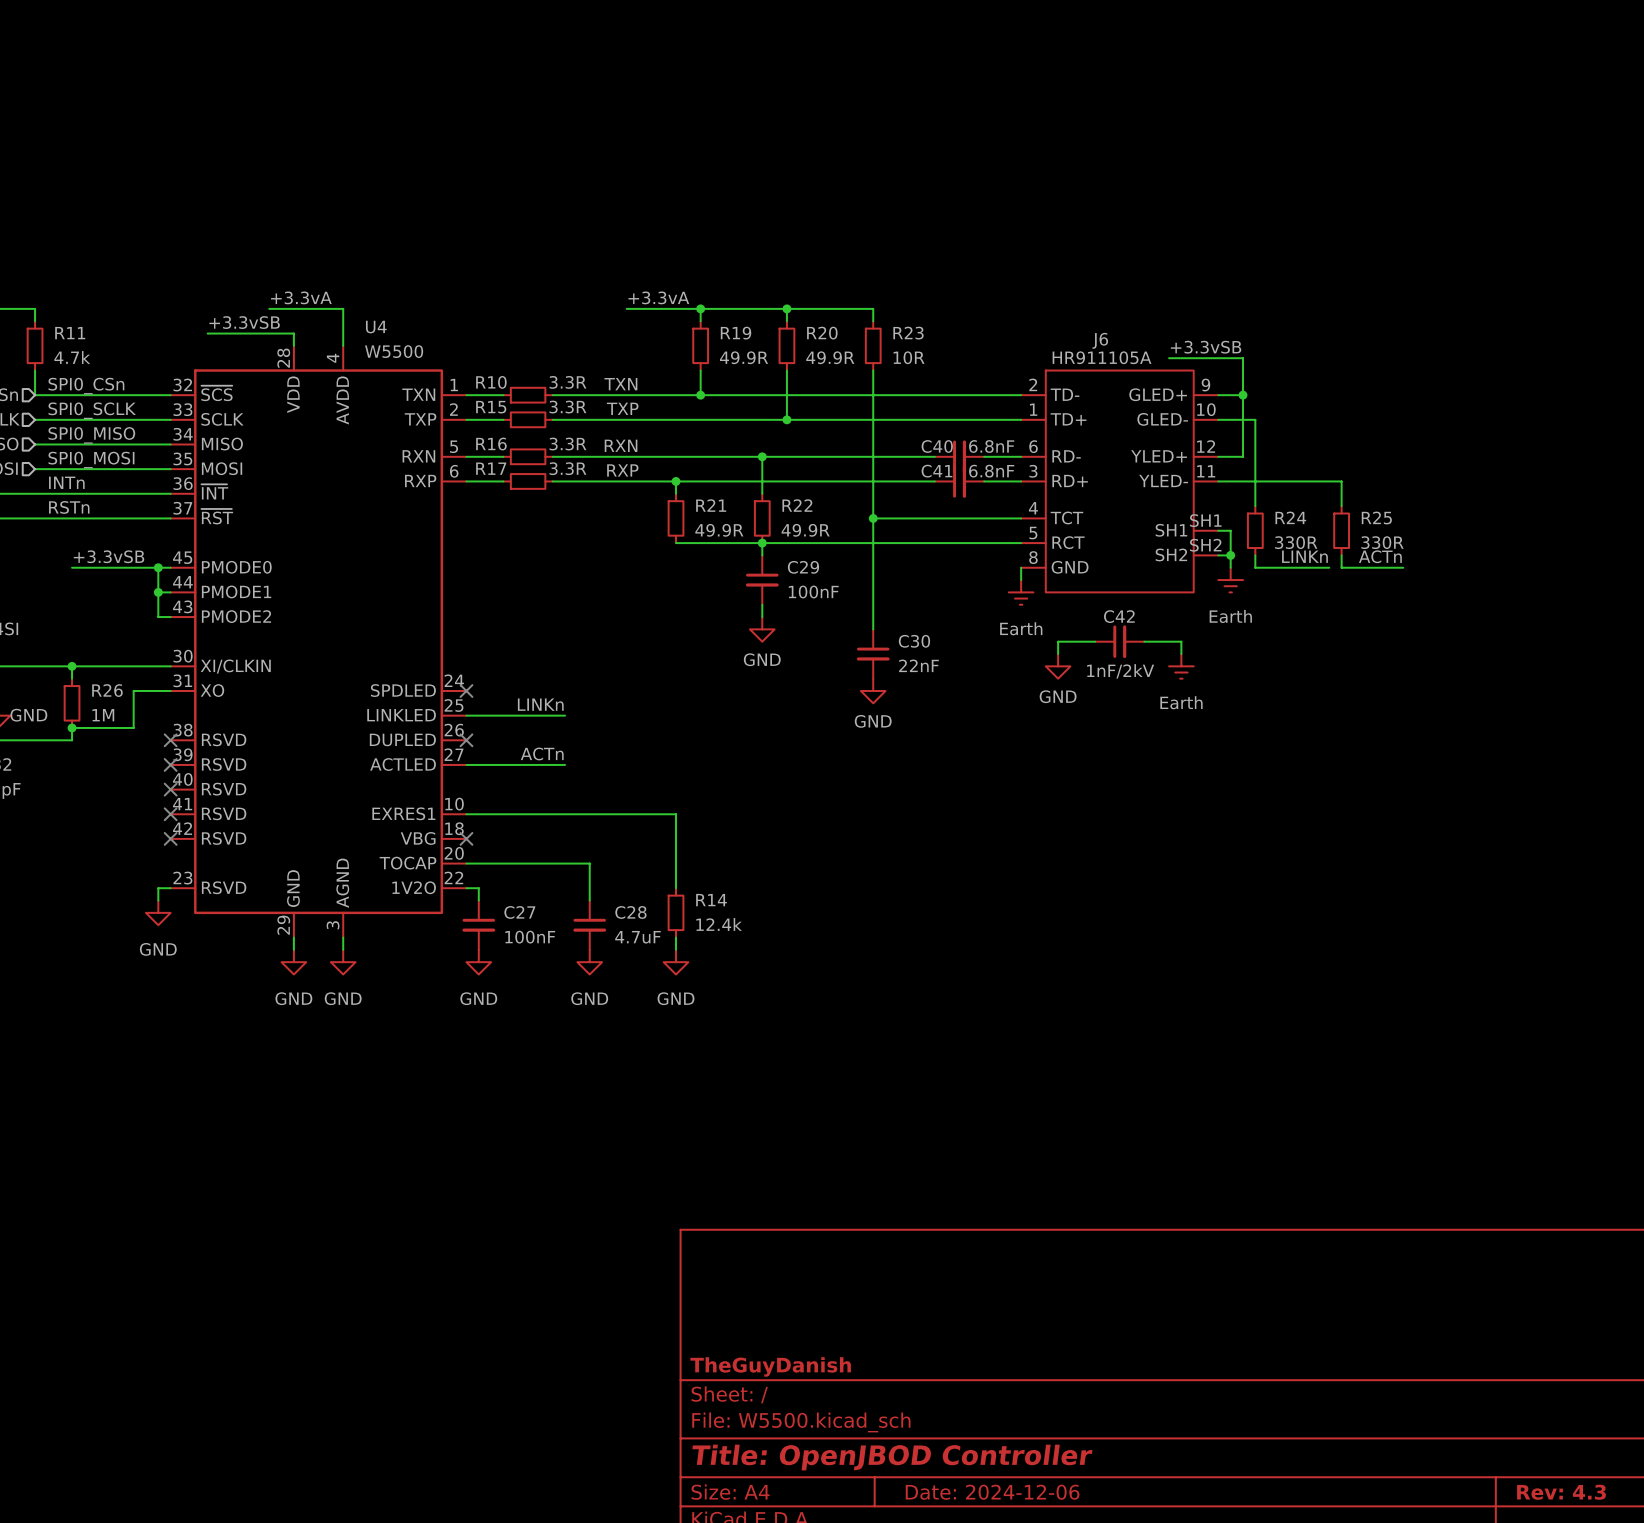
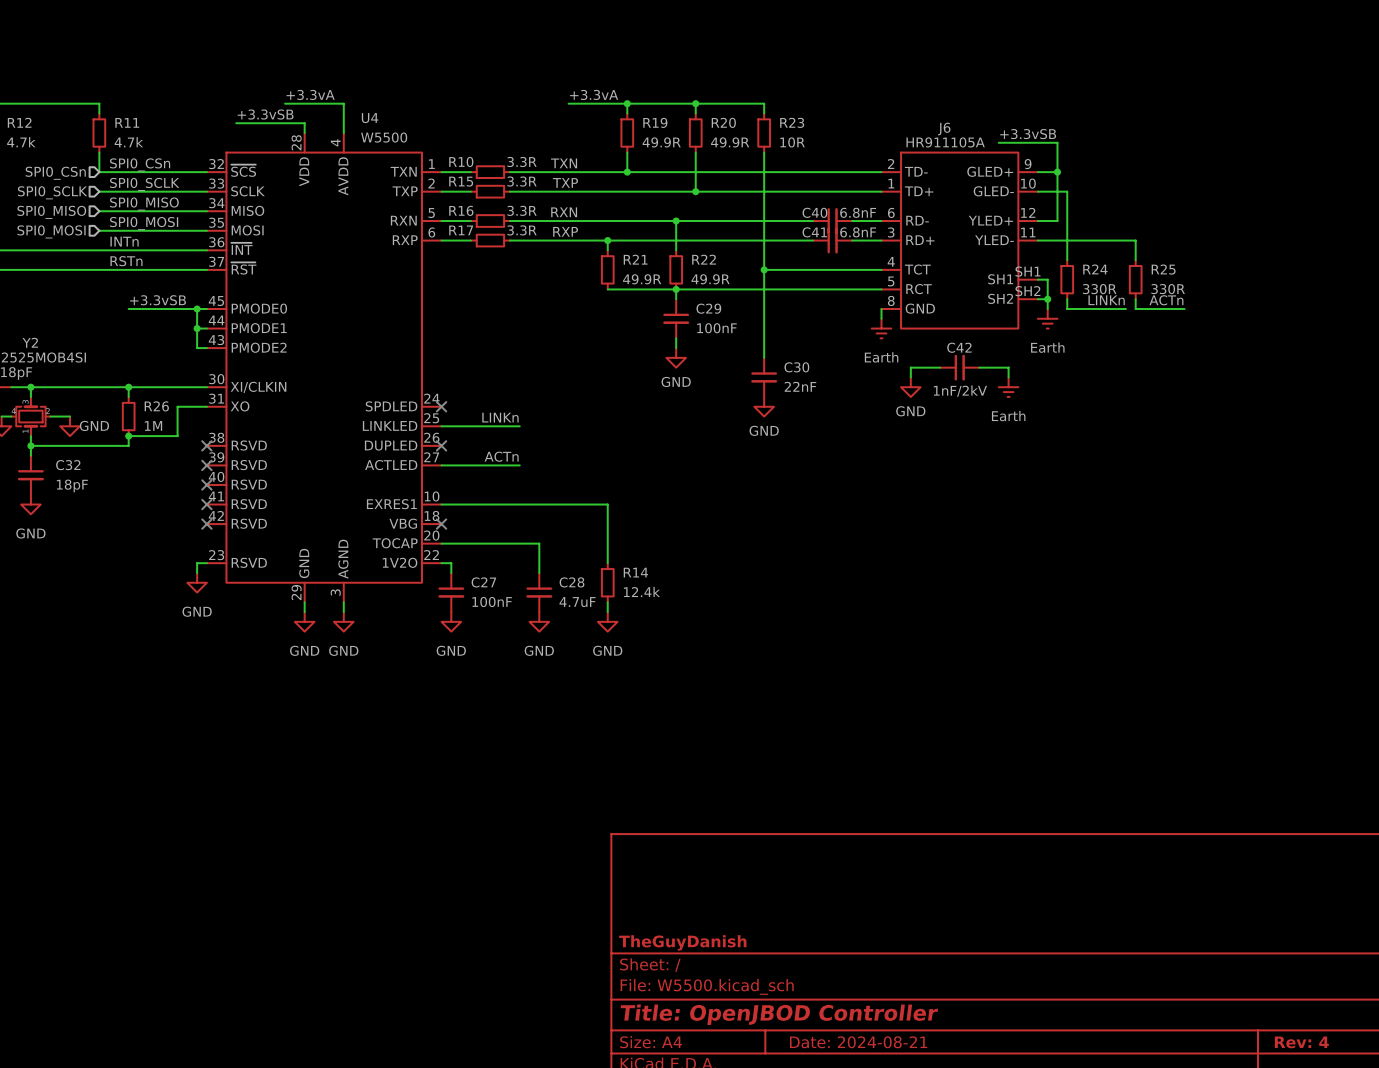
title block: Date: 2024-12-06 (992, 1492) -> Date: 2024-08-21 (858, 1042)
title block: Rev: 4.3 (1561, 1492) -> Rev: 4 (1301, 1042)

